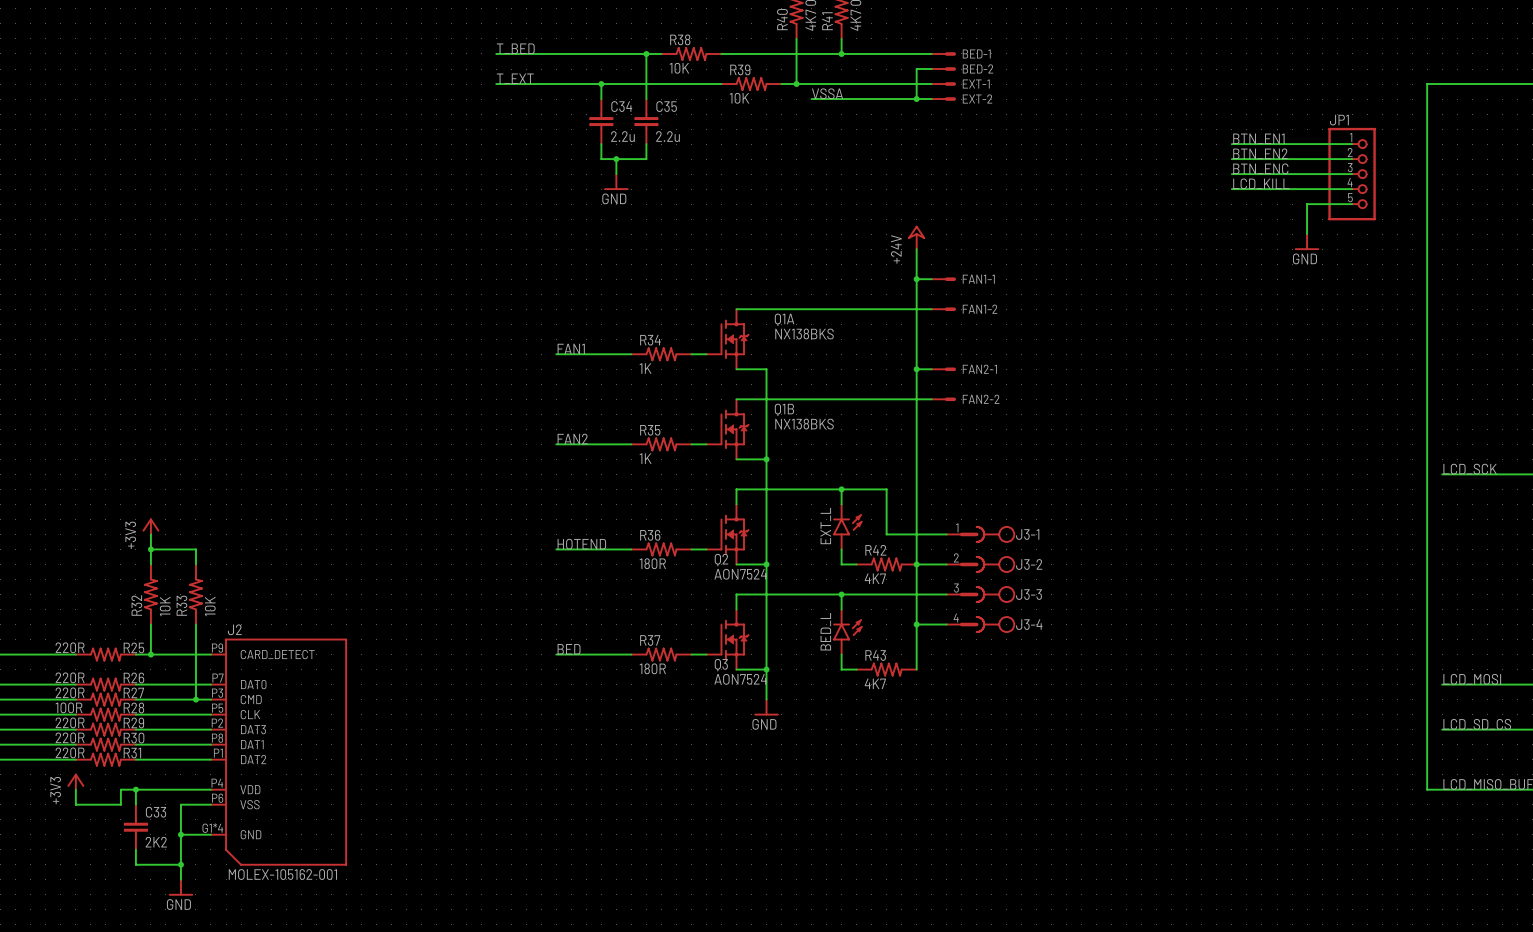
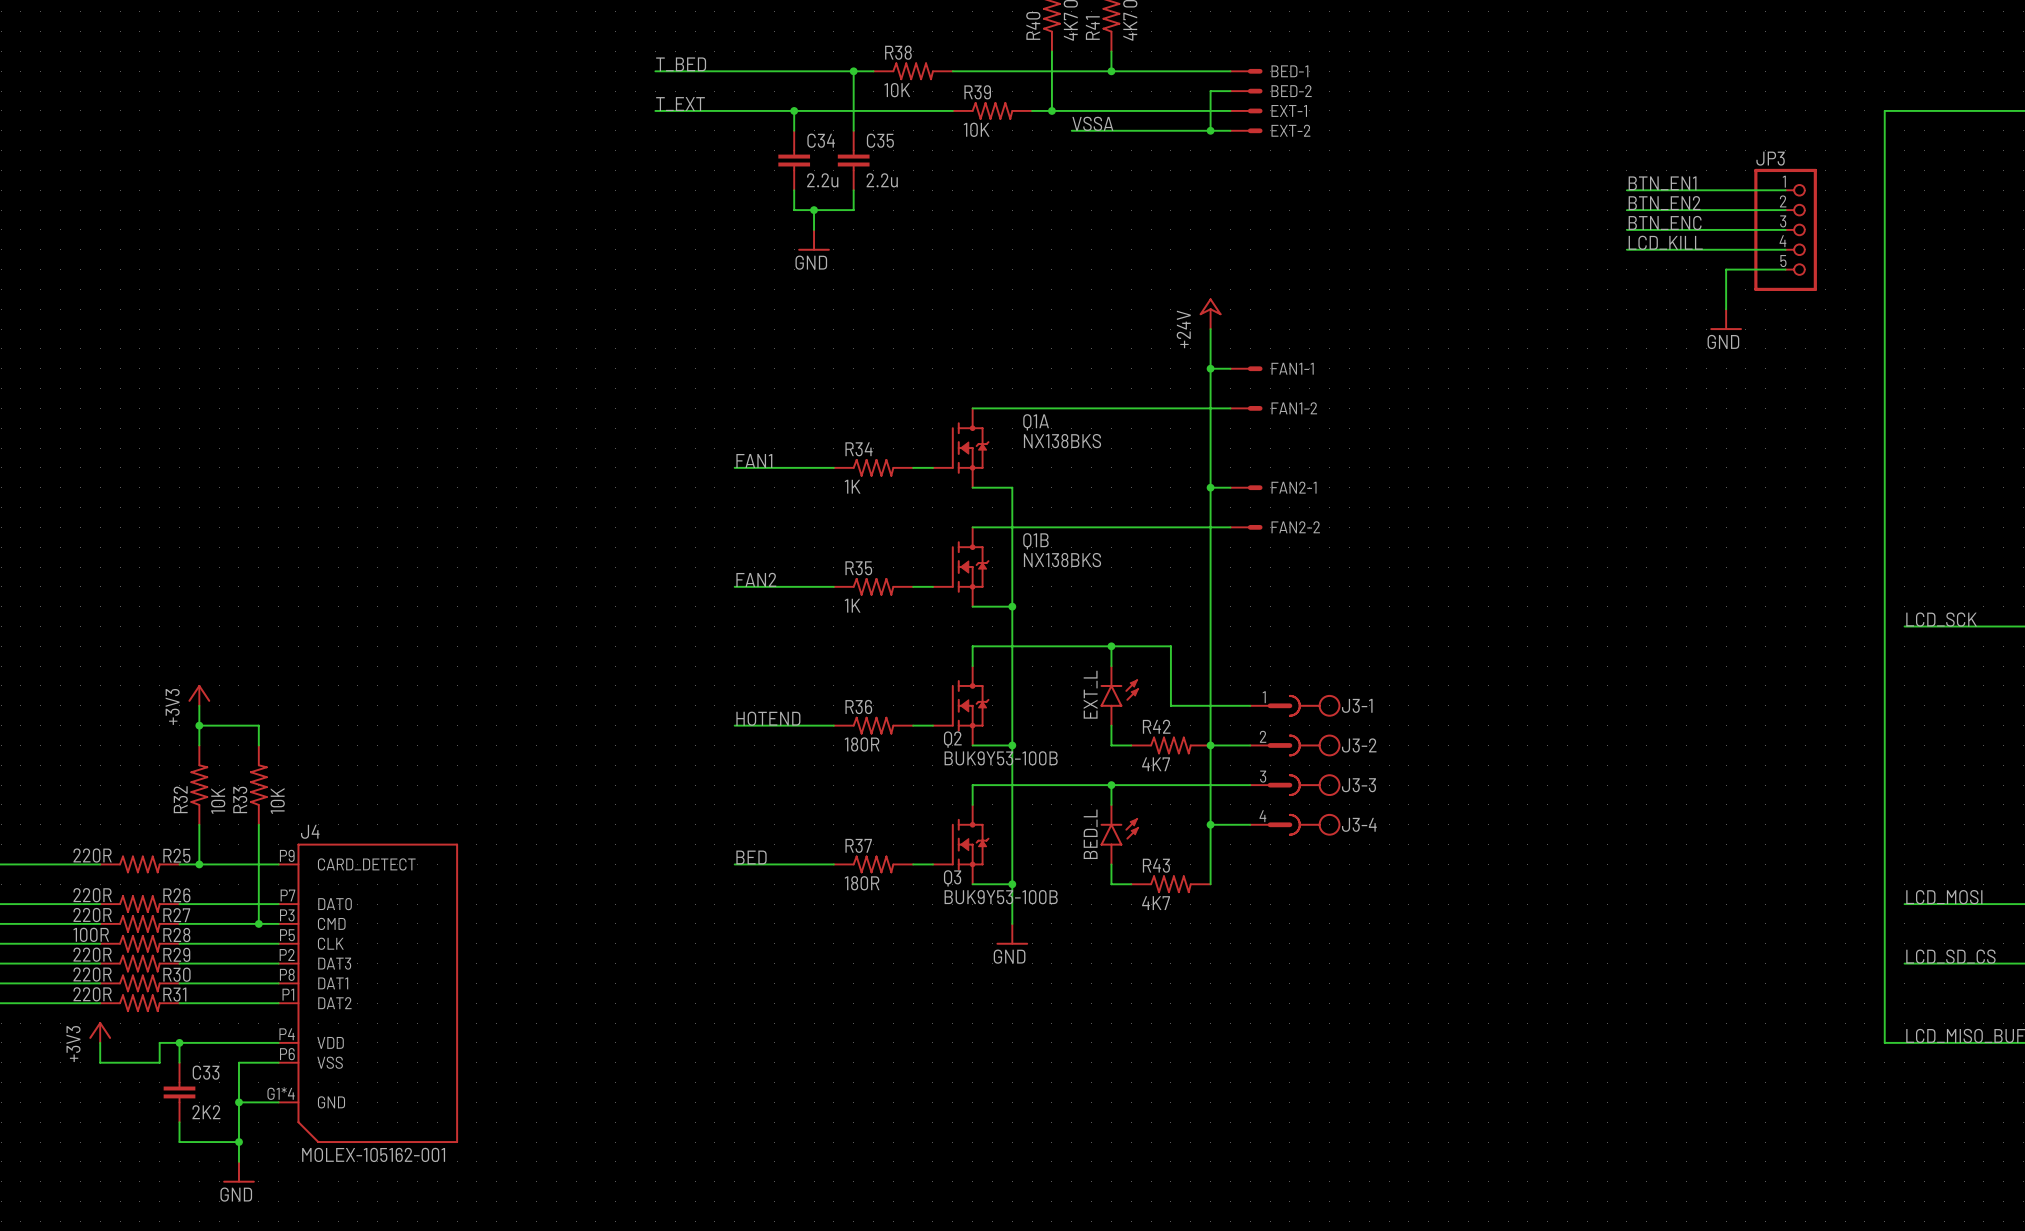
JP1 name: JP1 (1339, 120) -> JP3 (1770, 158)
Q2 value: AON7524 (740, 574) -> BUK9Y53-100B (1001, 758)
J2 name: J2 (234, 629) -> J4 (310, 831)
Q3 value: AON7524 (740, 679) -> BUK9Y53-100B (1001, 897)

